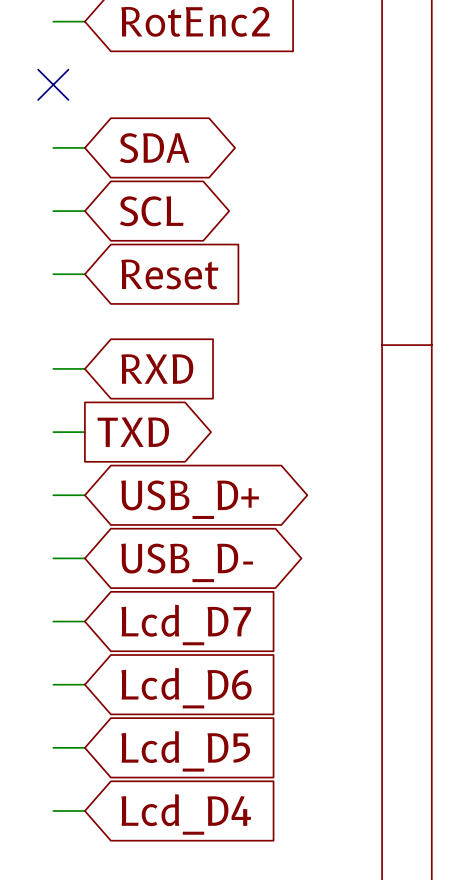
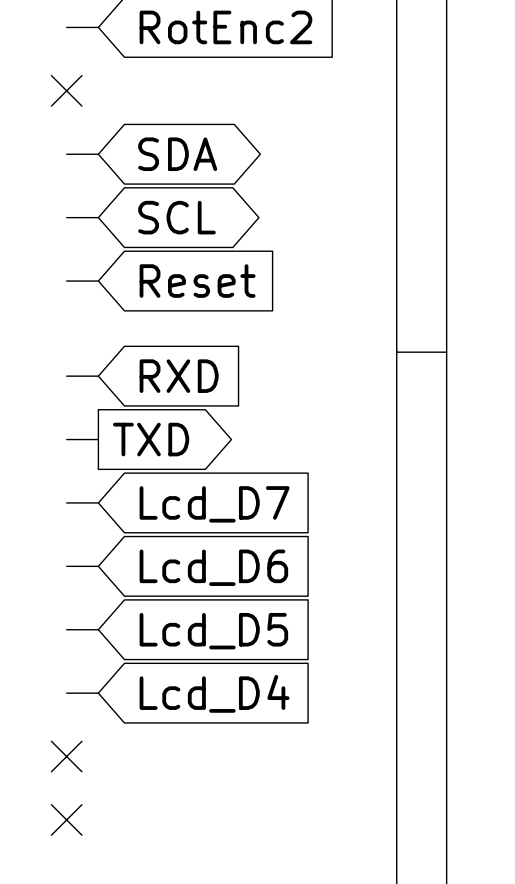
global label shape: bidirectional (190, 499) -> input (214, 504)
global label: USB_D+ (190, 499) -> Lcd_D7 (214, 504)
global label shape: bidirectional (187, 562) -> input (213, 567)
global label: USB_D- (187, 562) -> Lcd_D6 (213, 567)
global label: Lcd_D7 (186, 625) -> Lcd_D5 (213, 631)
global label: Lcd_D6 (186, 688) -> Lcd_D4 (214, 693)
wire: (53, 747) (84, 747) -> none
no-connect mark: none -> (66, 756)
global label: Lcd_D5 (185, 751) -> none
wire: (53, 810) (84, 810) -> none
no-connect mark: none -> (66, 819)
global label: Lcd_D4 (186, 814) -> none

